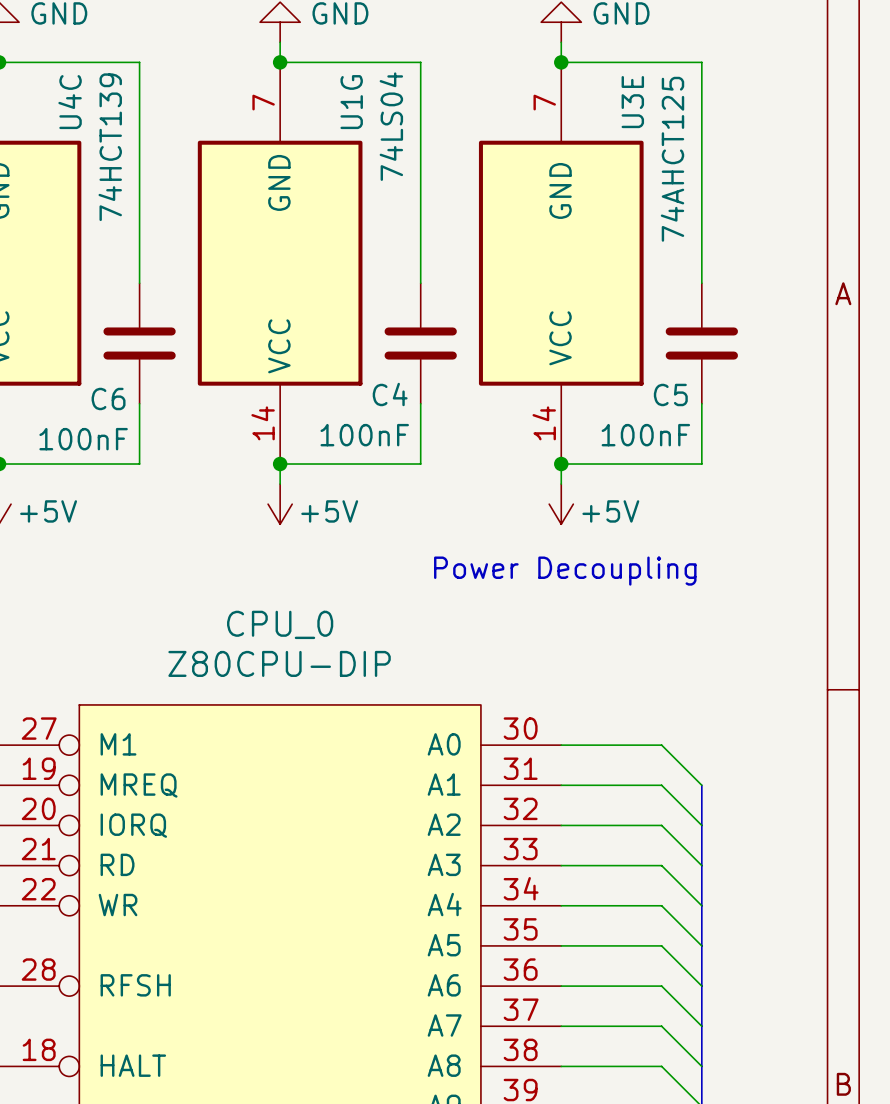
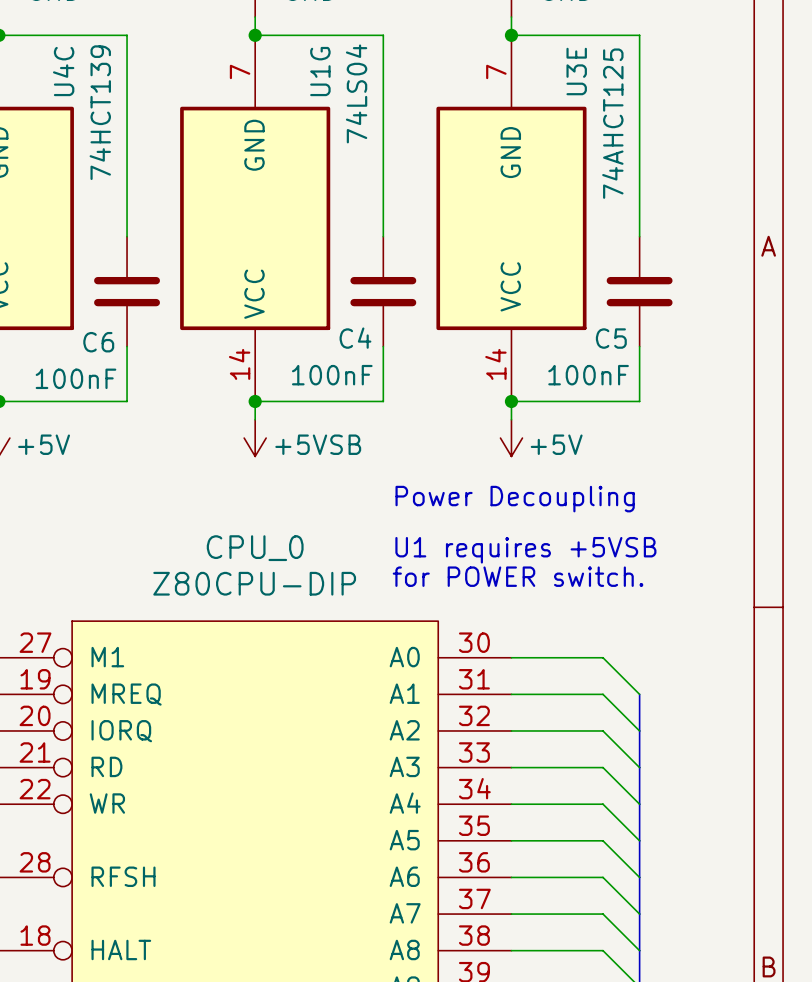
power symbol: +5V (280, 504) -> +5VSB (255, 438)
text: none -> U1 requires +5VSB (525, 550)
text: none -> for POWER switch. (518, 576)

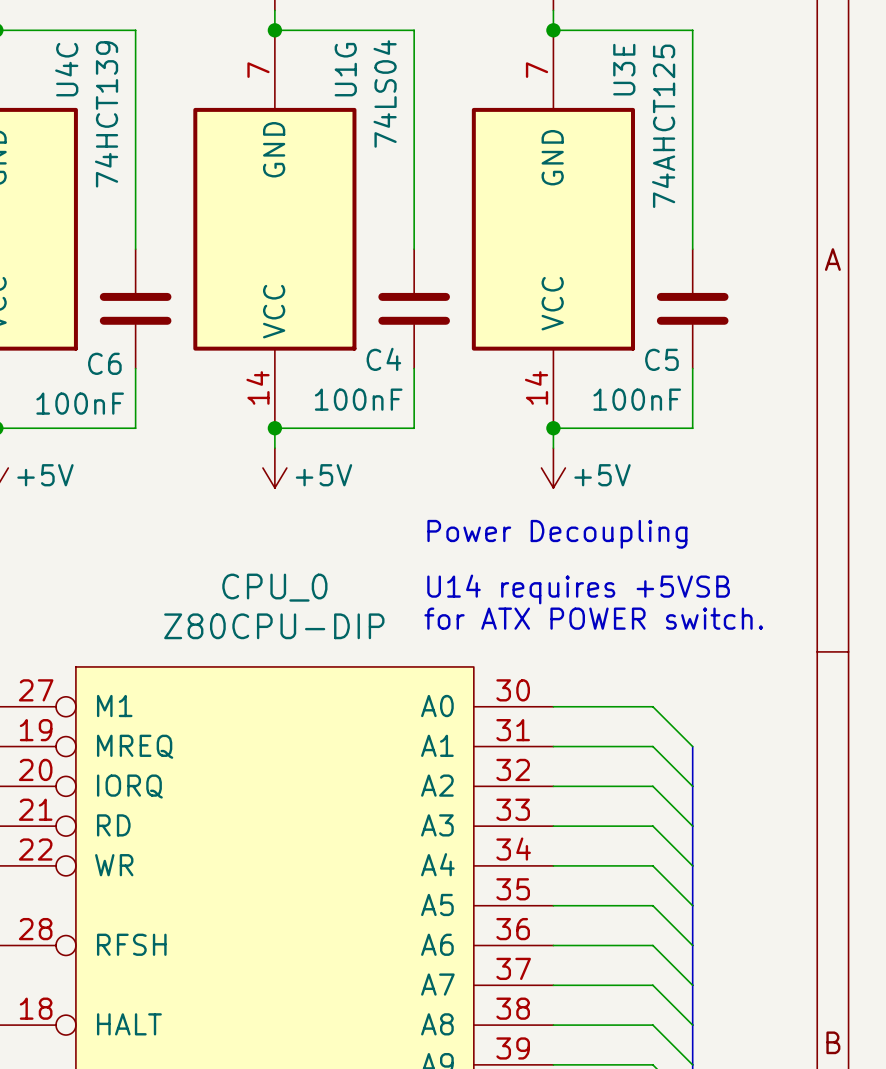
power symbol: +5VSB (255, 438) -> +5V (274, 468)
text: U1 requires +5VSB (525, 550) -> U14 requires +5VSB (578, 589)
text: for POWER switch. (518, 576) -> for ATX POWER switch. (593, 618)

